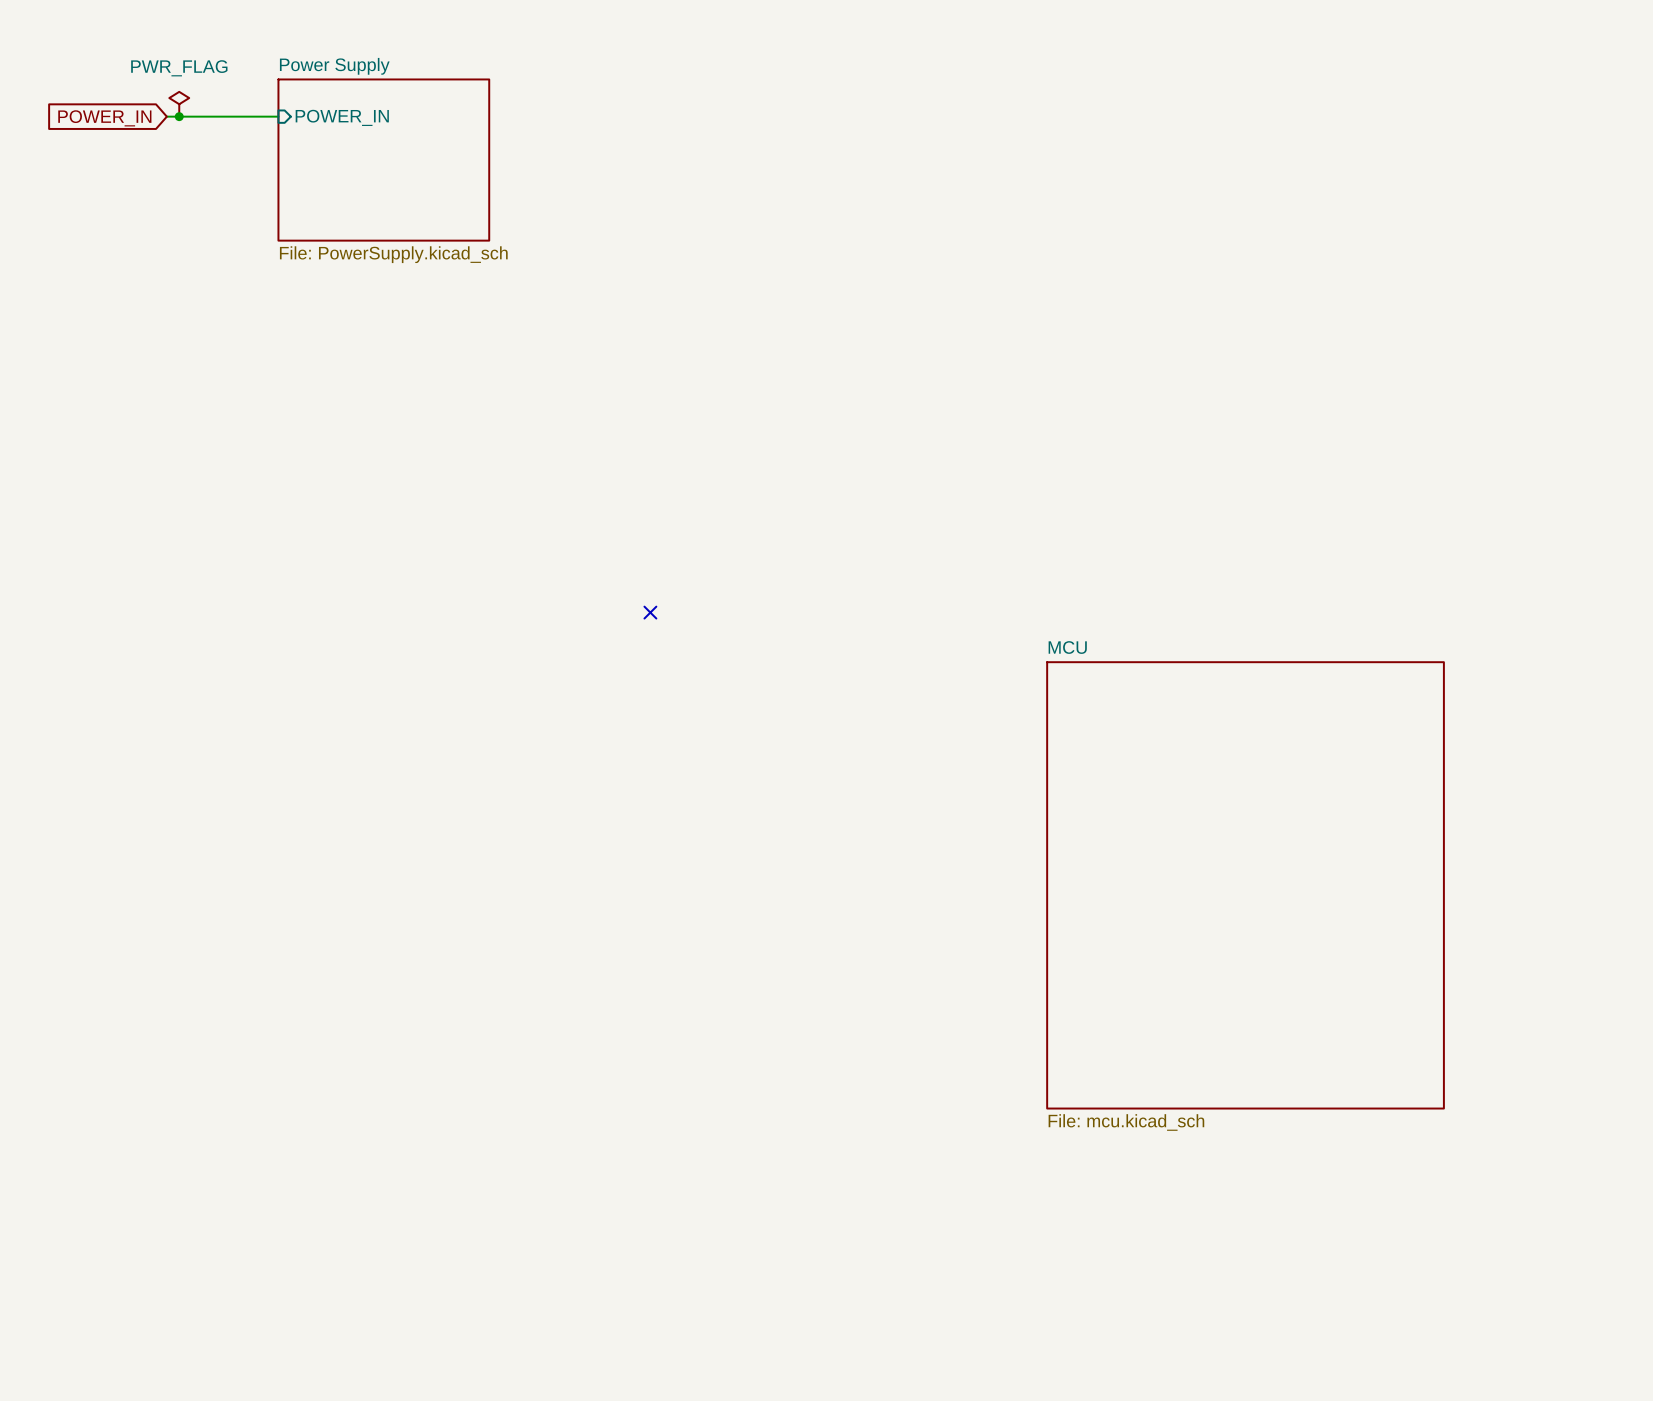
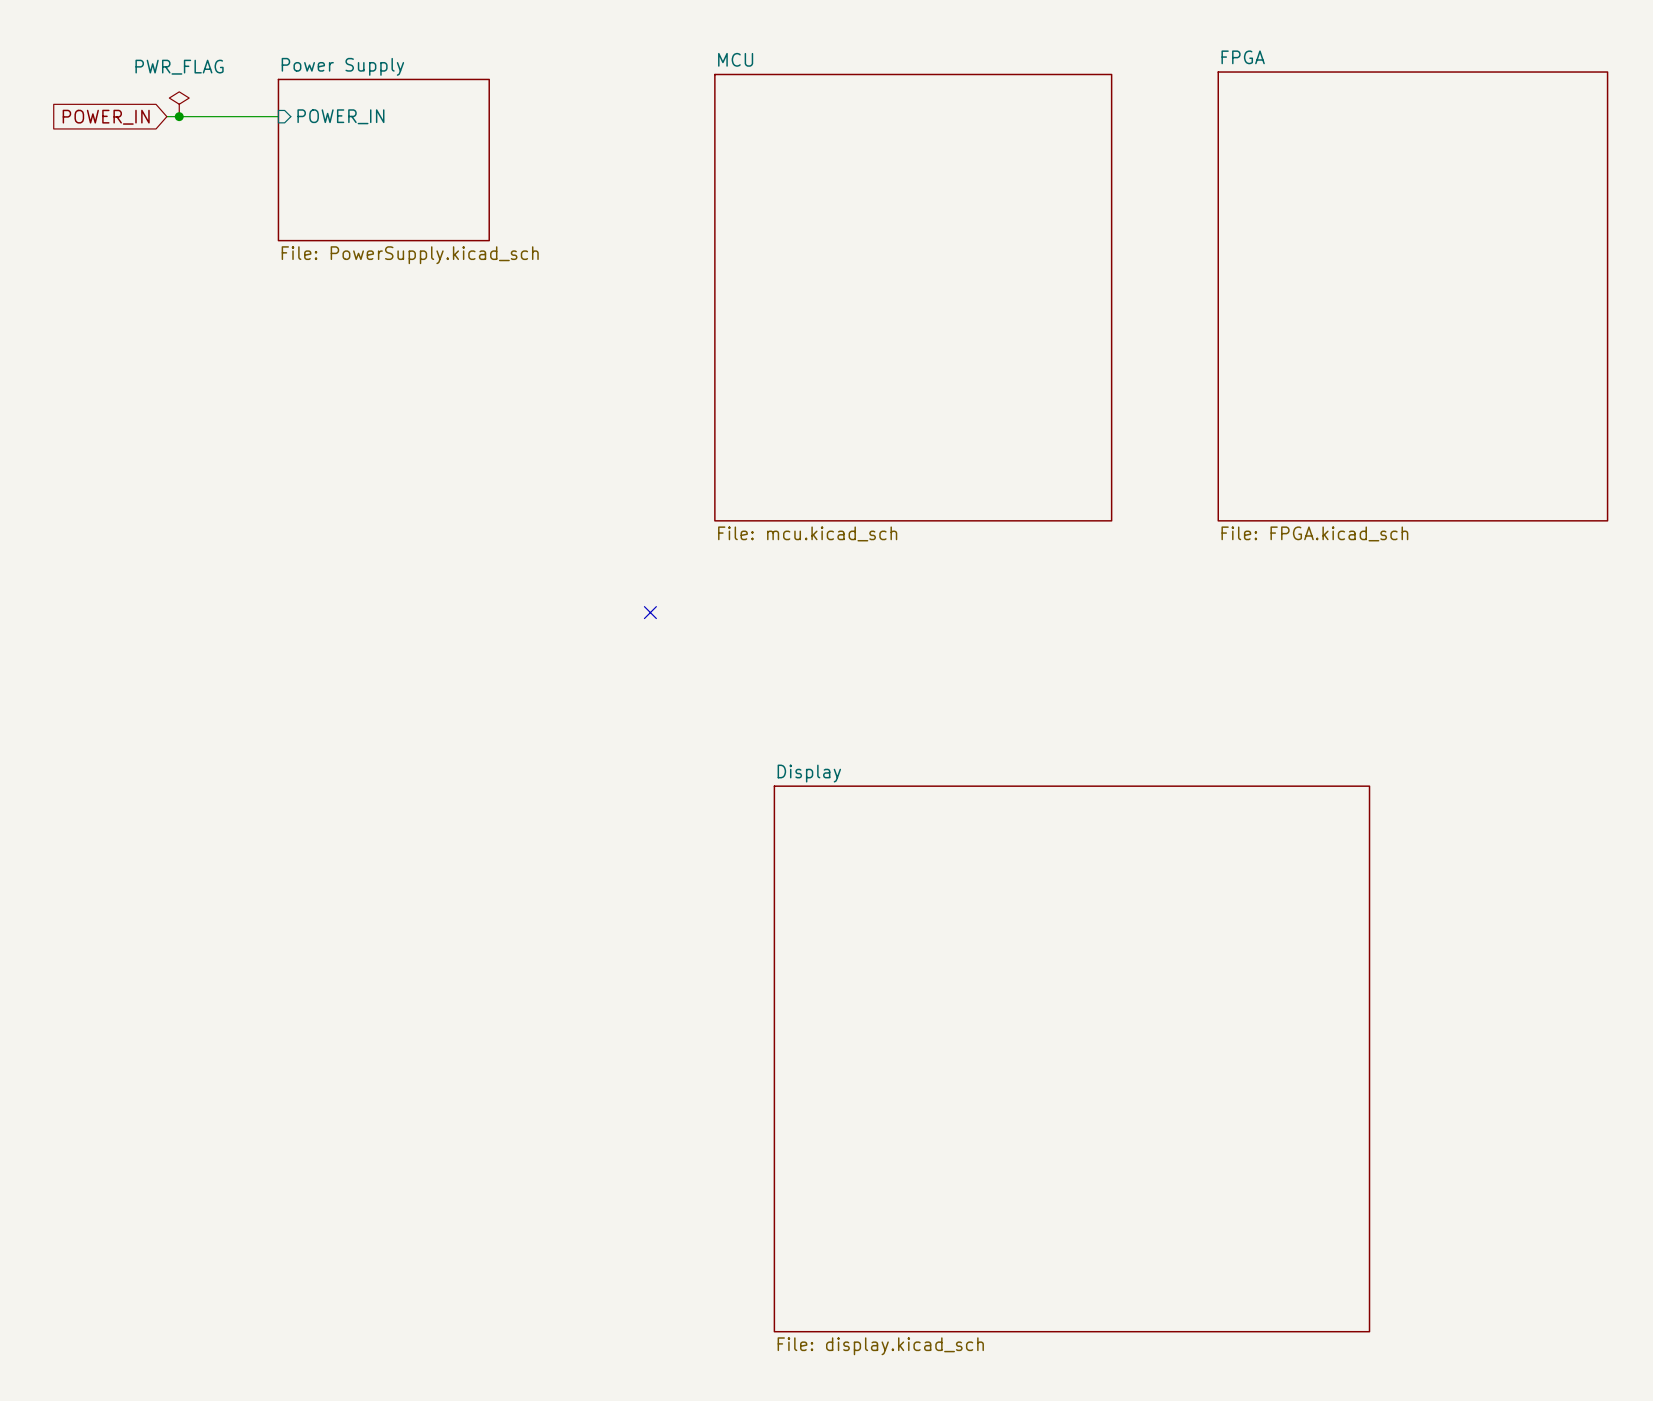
sheet FPGA: none -> File: FPGA.kicad_sch (1412, 296)
sheet MCU: none -> File: mcu.kicad_sch (913, 297)
sheet MCU: File: mcu.kicad_sch (1245, 885) -> none
sheet Display: none -> File: display.kicad_sch (1071, 1058)

